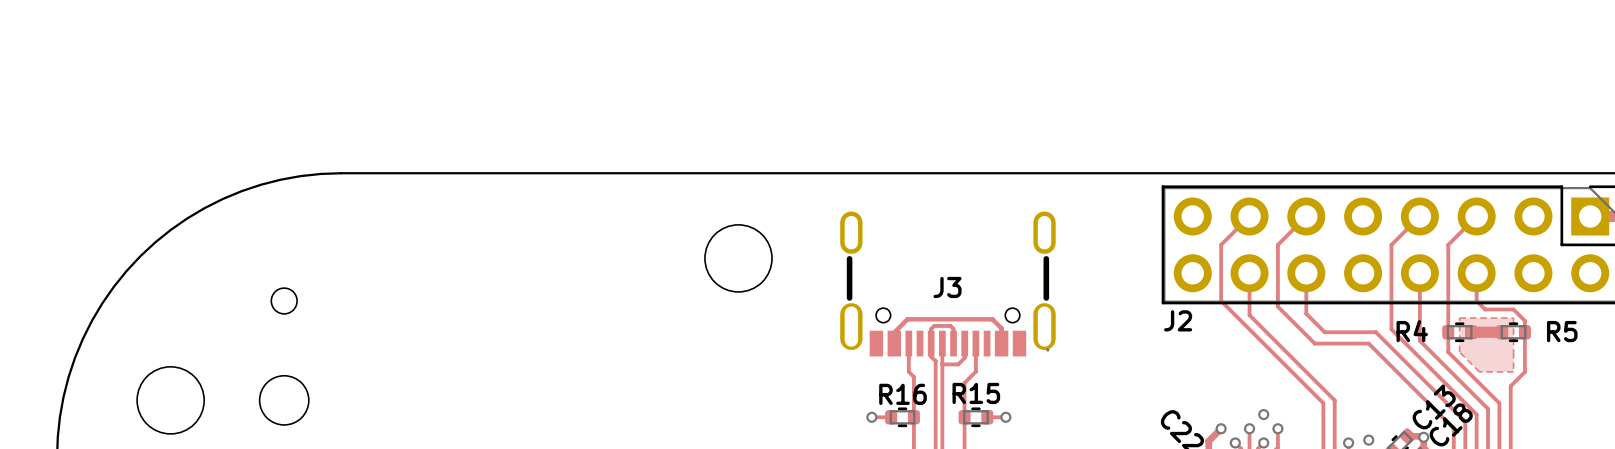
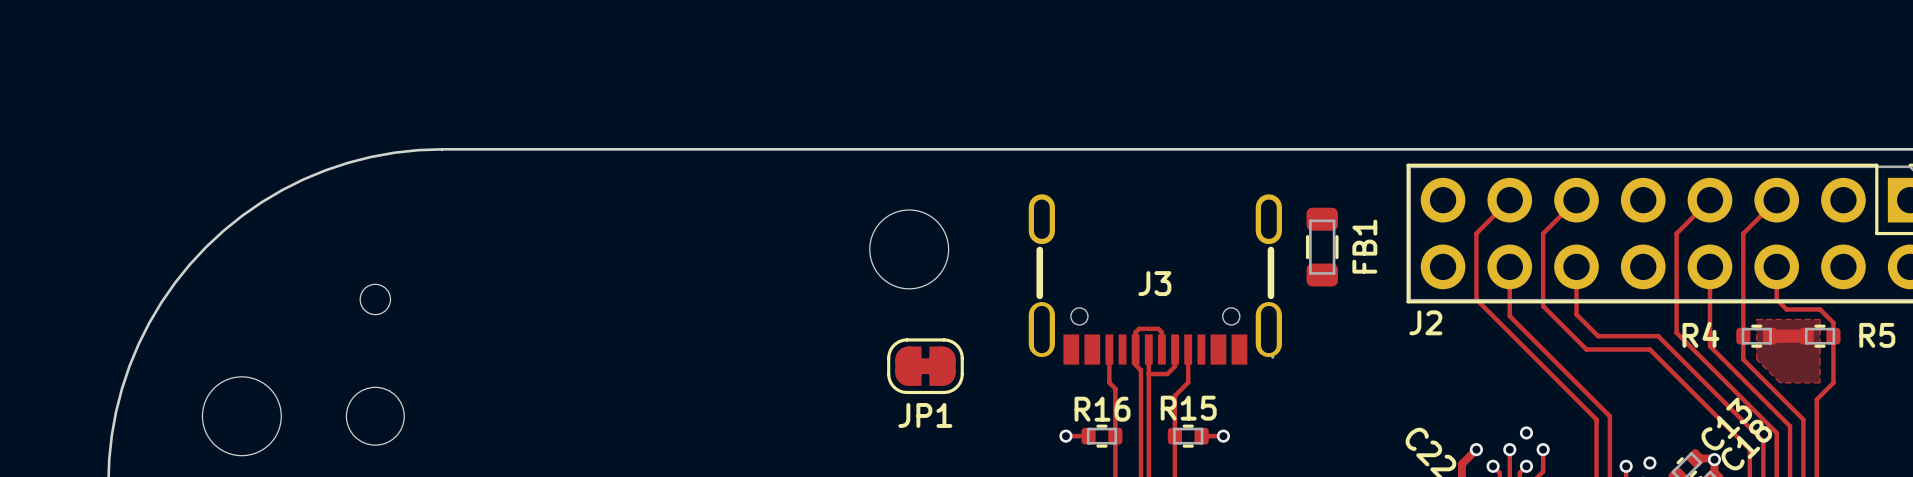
FB1: none -> (1322, 247)
track: (894, 343) (894, 332) (907, 319) (992, 319) (1001, 328) (1001, 343) -> none
JP1: none -> (925, 366)

